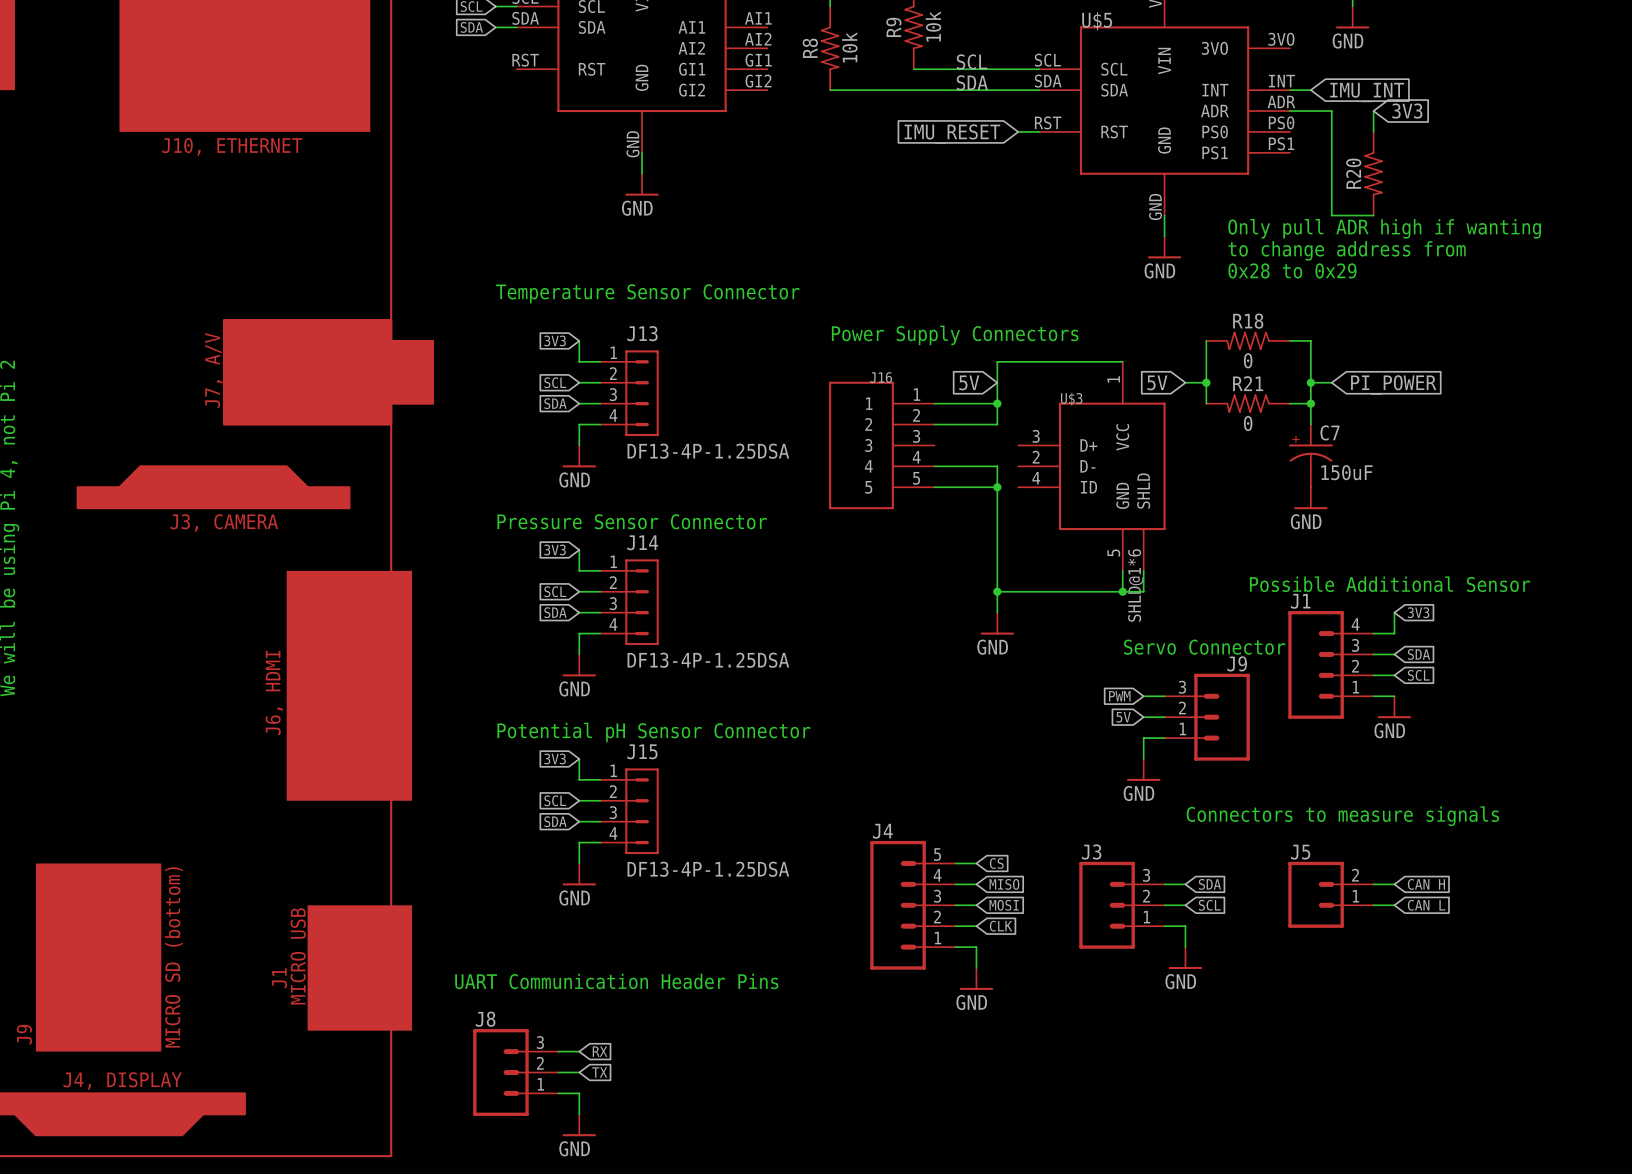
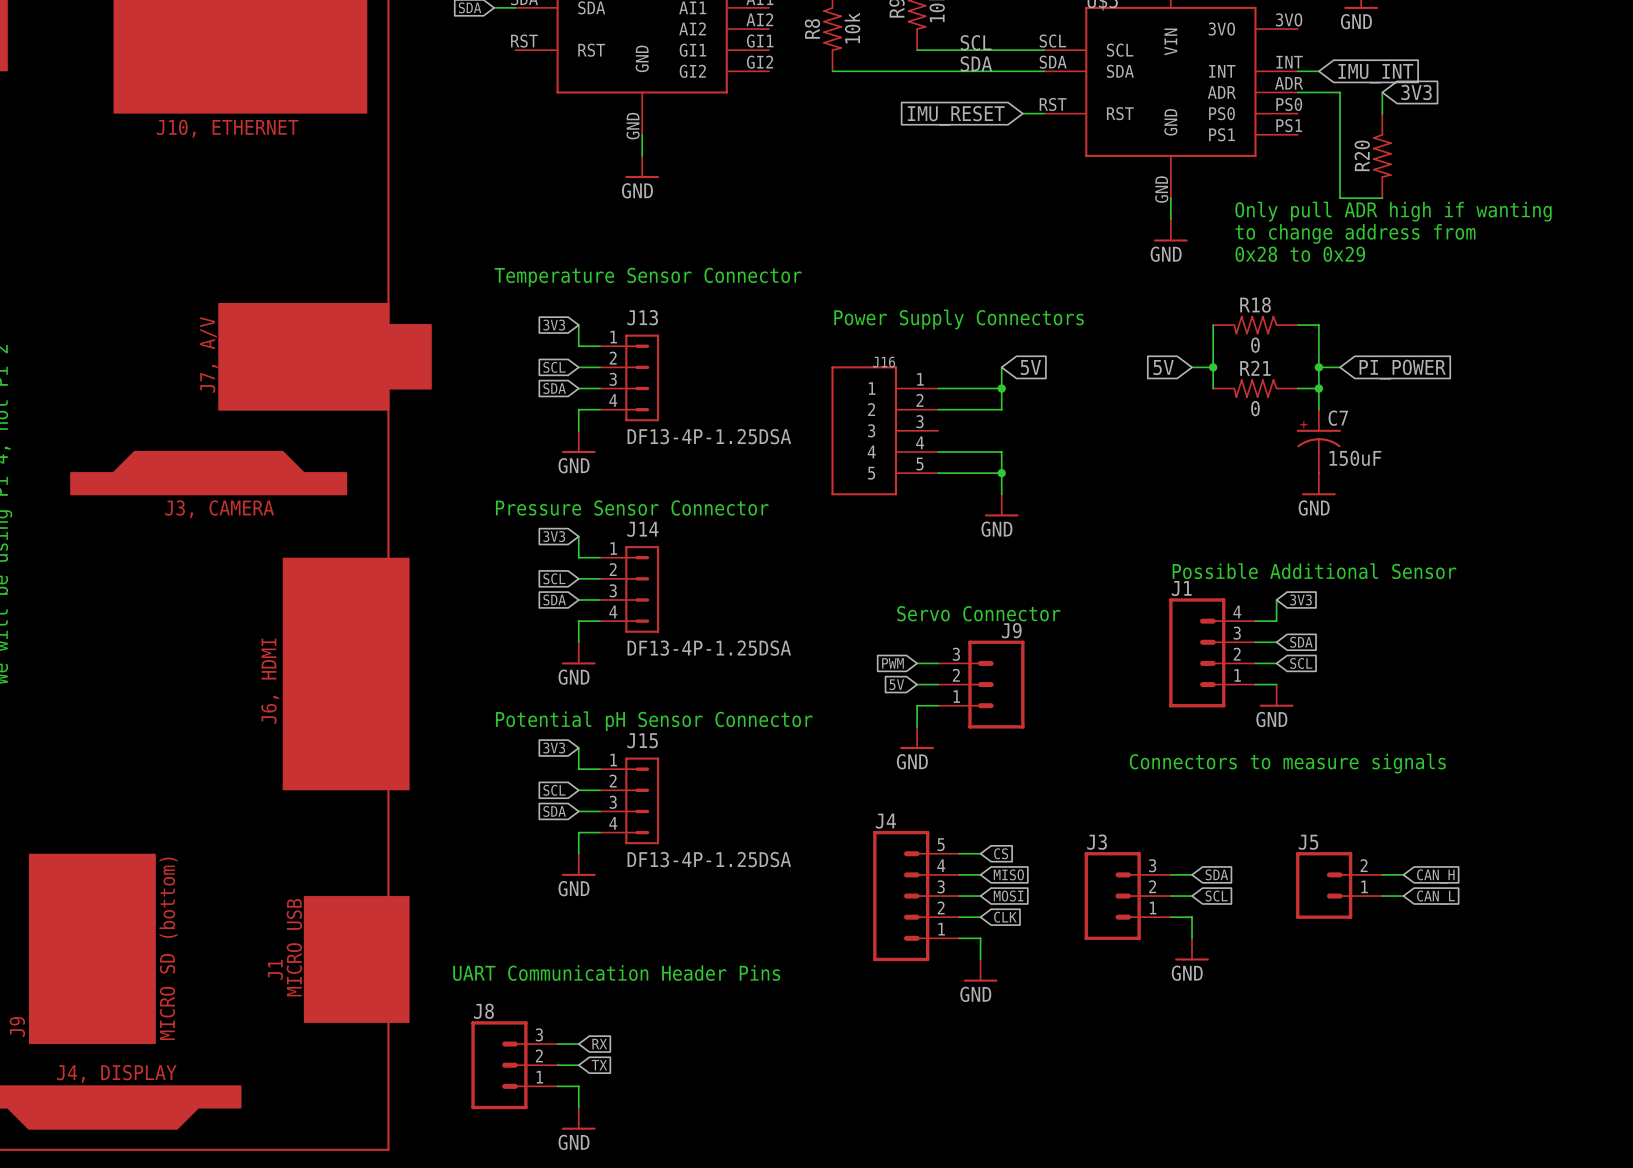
wire: (1122, 361) (997, 361) (997, 382) -> none
global label rotation: 0° (969, 382) -> 180° (1030, 367)
global label position: 5V (969, 382) -> 5V (1030, 367)
U$3: (1091, 466) -> none
wire: (997, 508) (997, 612) -> none
power symbol: none -> GND (1001, 505)
wire: (1122, 570) (1122, 591) -> none
wire: (1143, 570) (1143, 591) (997, 591) -> none
text position: Possible Additional Sensor (1390, 584) -> Possible Additional Sensor (1314, 571)
junction: (997, 591) -> none
junction: (1122, 591) -> none
wire: (1394, 612) (1394, 633) (1373, 633) -> (1276, 599) (1276, 621) (1255, 621)
global label position: 3V3 (1418, 612) -> 3V3 (1301, 599)
power symbol: GND (997, 623) -> none
text: none -> Servo Connector (978, 613)
text: Servo Connector (1204, 647) -> none
wire: (1373, 654) (1394, 654) -> (1255, 642) (1276, 642)
global label position: SDA (1418, 654) -> SDA (1301, 642)
J1 position: (1330, 664) -> (1212, 652)
global label: none -> PWM (892, 663)
wire: none -> (917, 663) (938, 663)
wire: (1373, 675) (1394, 675) -> (1255, 663) (1276, 663)
global label position: SCL (1418, 675) -> SCL (1301, 663)
global label: none -> 5V (896, 684)
wire: none -> (917, 684) (938, 684)
global label: PWM (1119, 696) -> none
wire: (1143, 696) (1164, 696) -> none
wire: (1373, 696) (1394, 696) -> (1255, 684) (1276, 684)
power symbol: none -> GND (1276, 695)
power symbol: GND (1394, 707) -> none
wire: none -> (938, 705) (917, 705) (917, 726)
global label: 5V (1123, 717) -> none
wire: (1143, 717) (1164, 717) -> none
J9 position: (1207, 717) -> (981, 684)
wire: (1164, 738) (1143, 738) (1143, 758) -> none
power symbol: none -> GND (917, 737)
power symbol: GND (1143, 769) -> none
text position: Connectors to measure signals (1342, 816) -> Connectors to measure signals (1287, 763)

